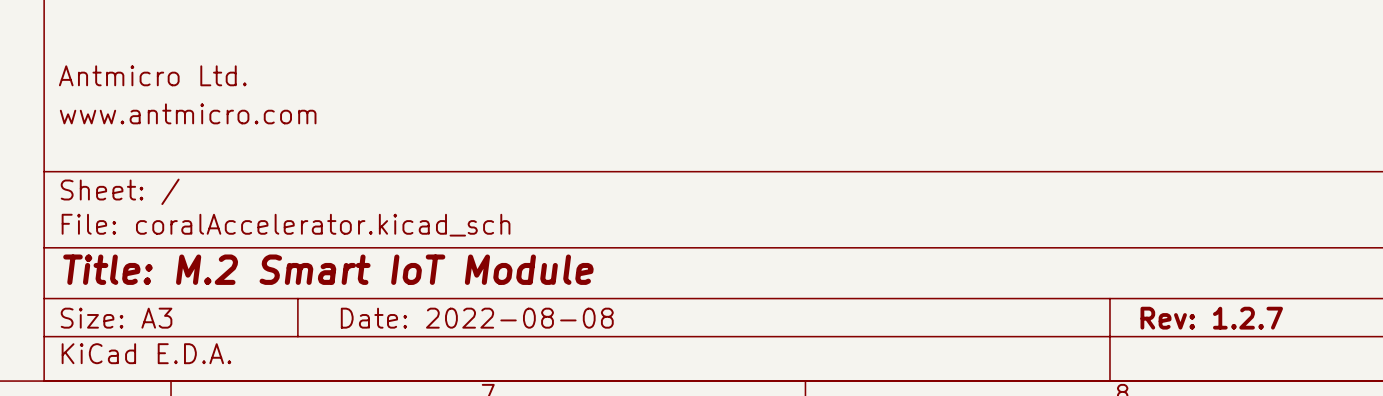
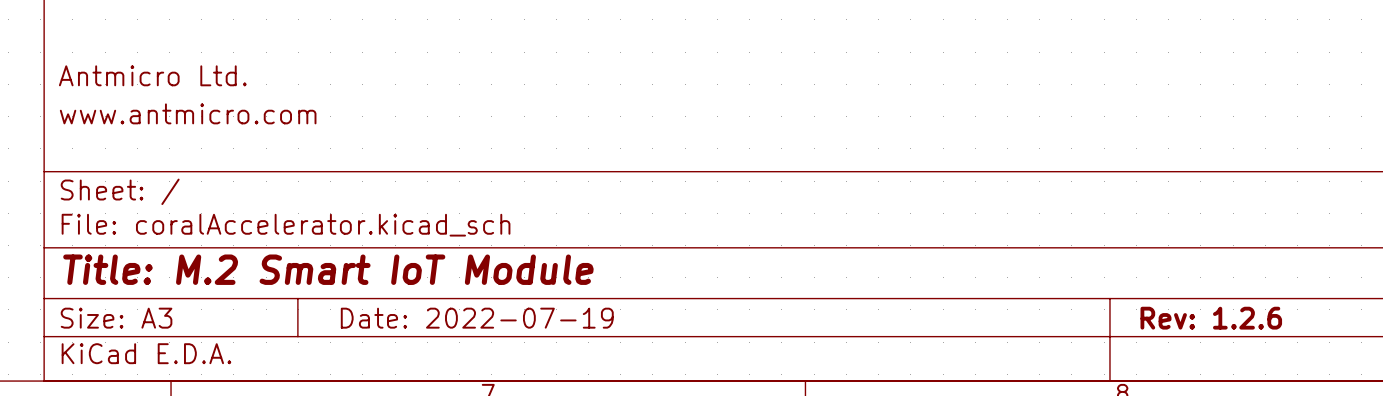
title block: Date: 2022-08-08 (477, 318) -> Date: 2022-07-19 (477, 318)
title block: Rev: 1.2.7 (1211, 318) -> Rev: 1.2.6 (1211, 318)

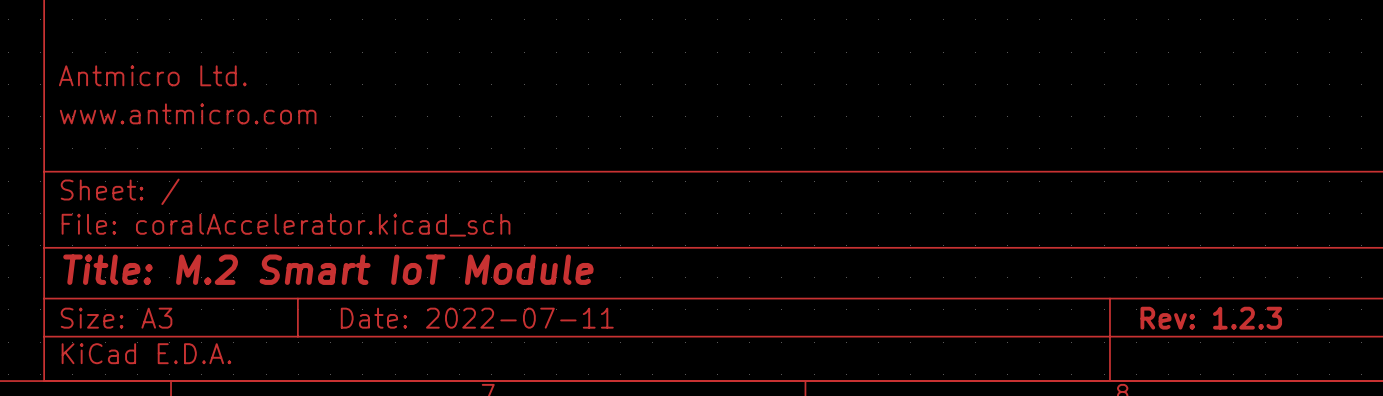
title block: Date: 2022-07-19 (477, 318) -> Date: 2022-07-11 (477, 318)
title block: Rev: 1.2.6 (1211, 318) -> Rev: 1.2.3 (1211, 318)

